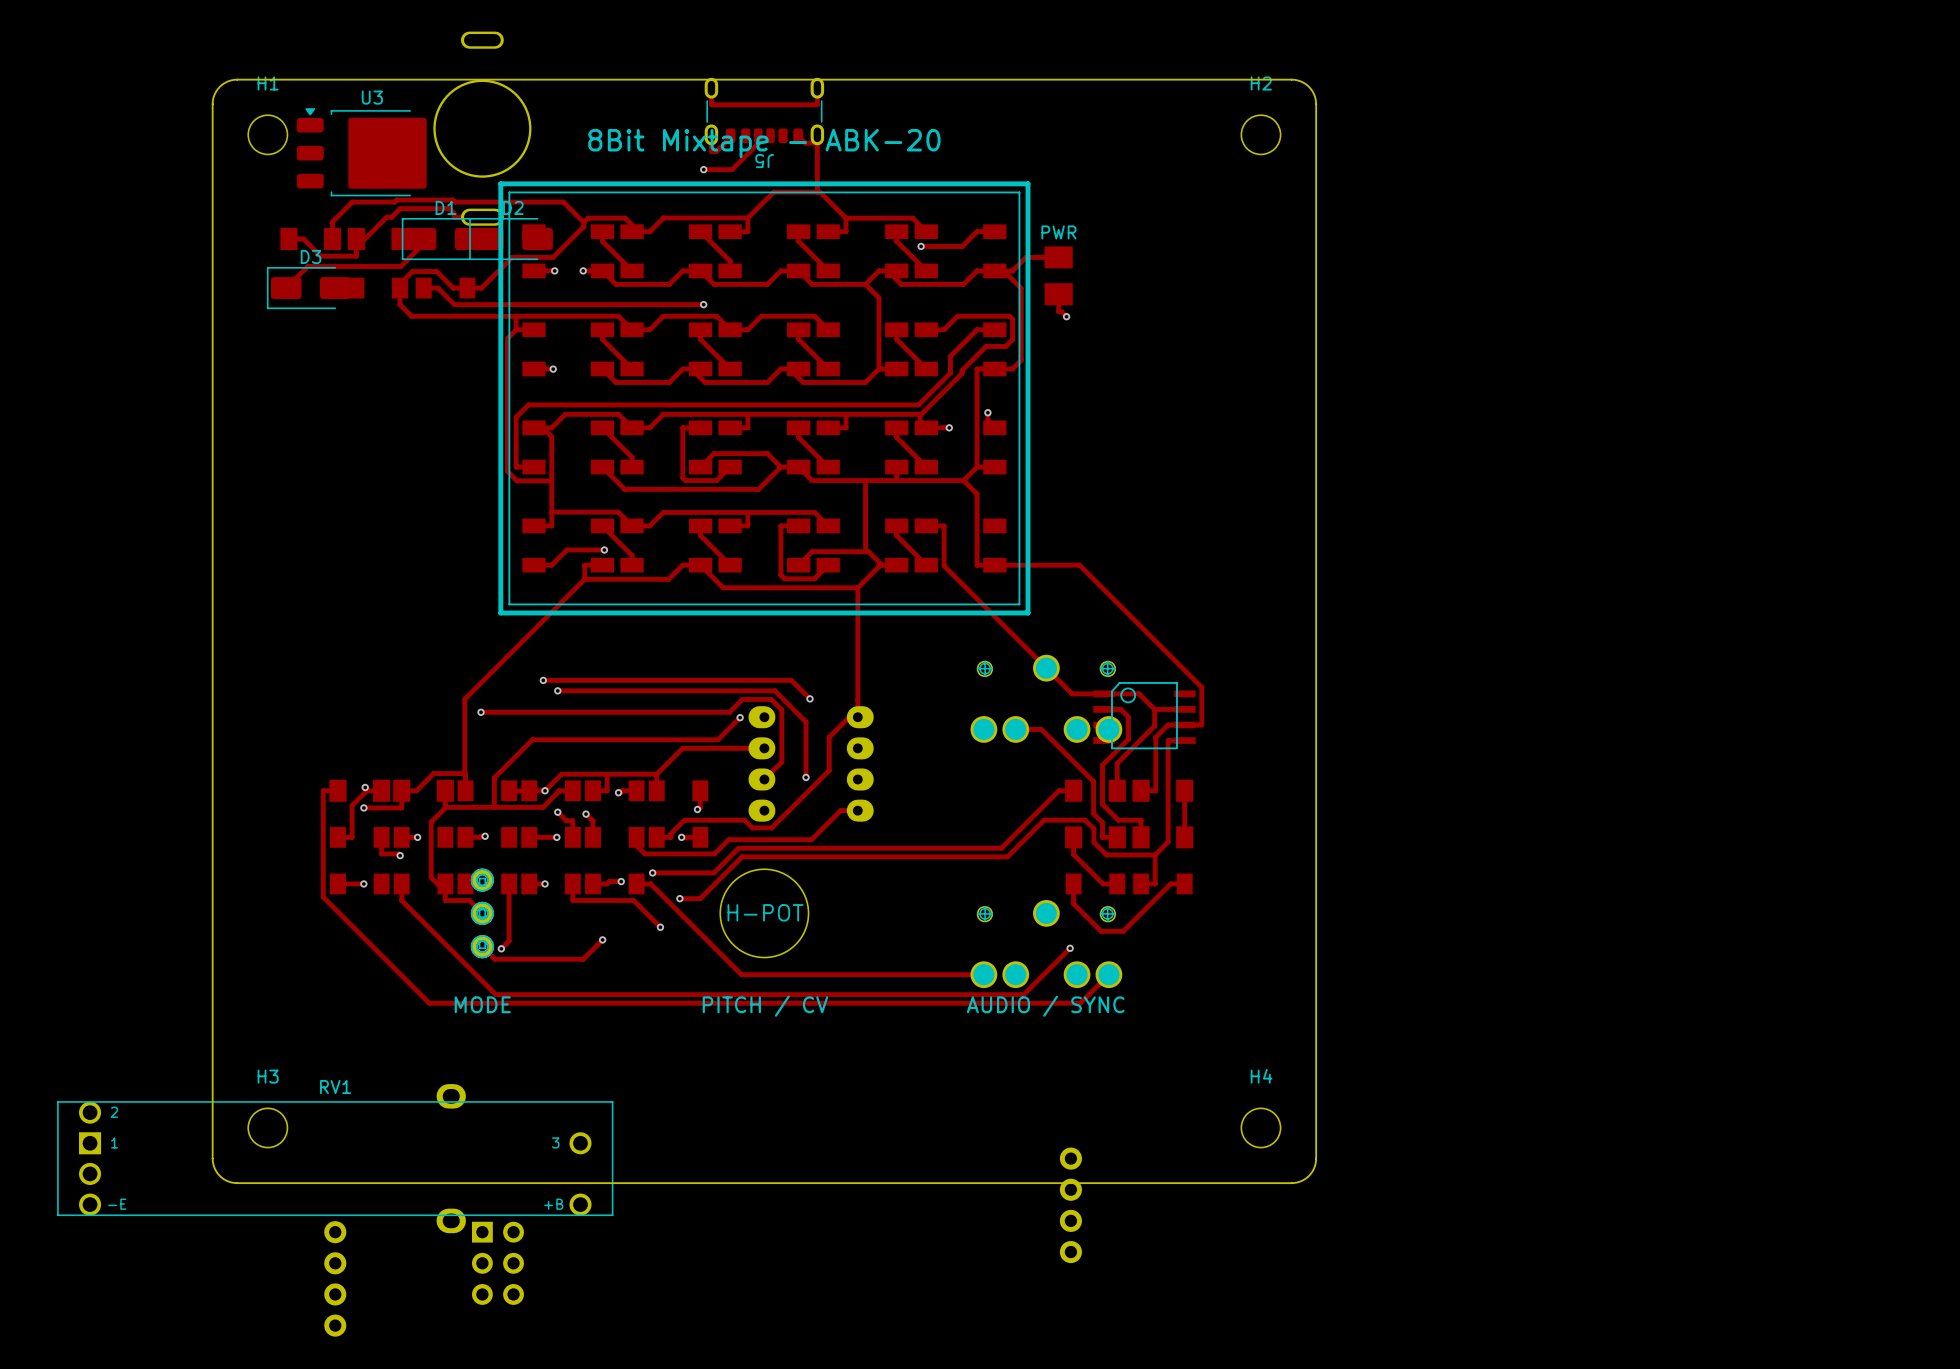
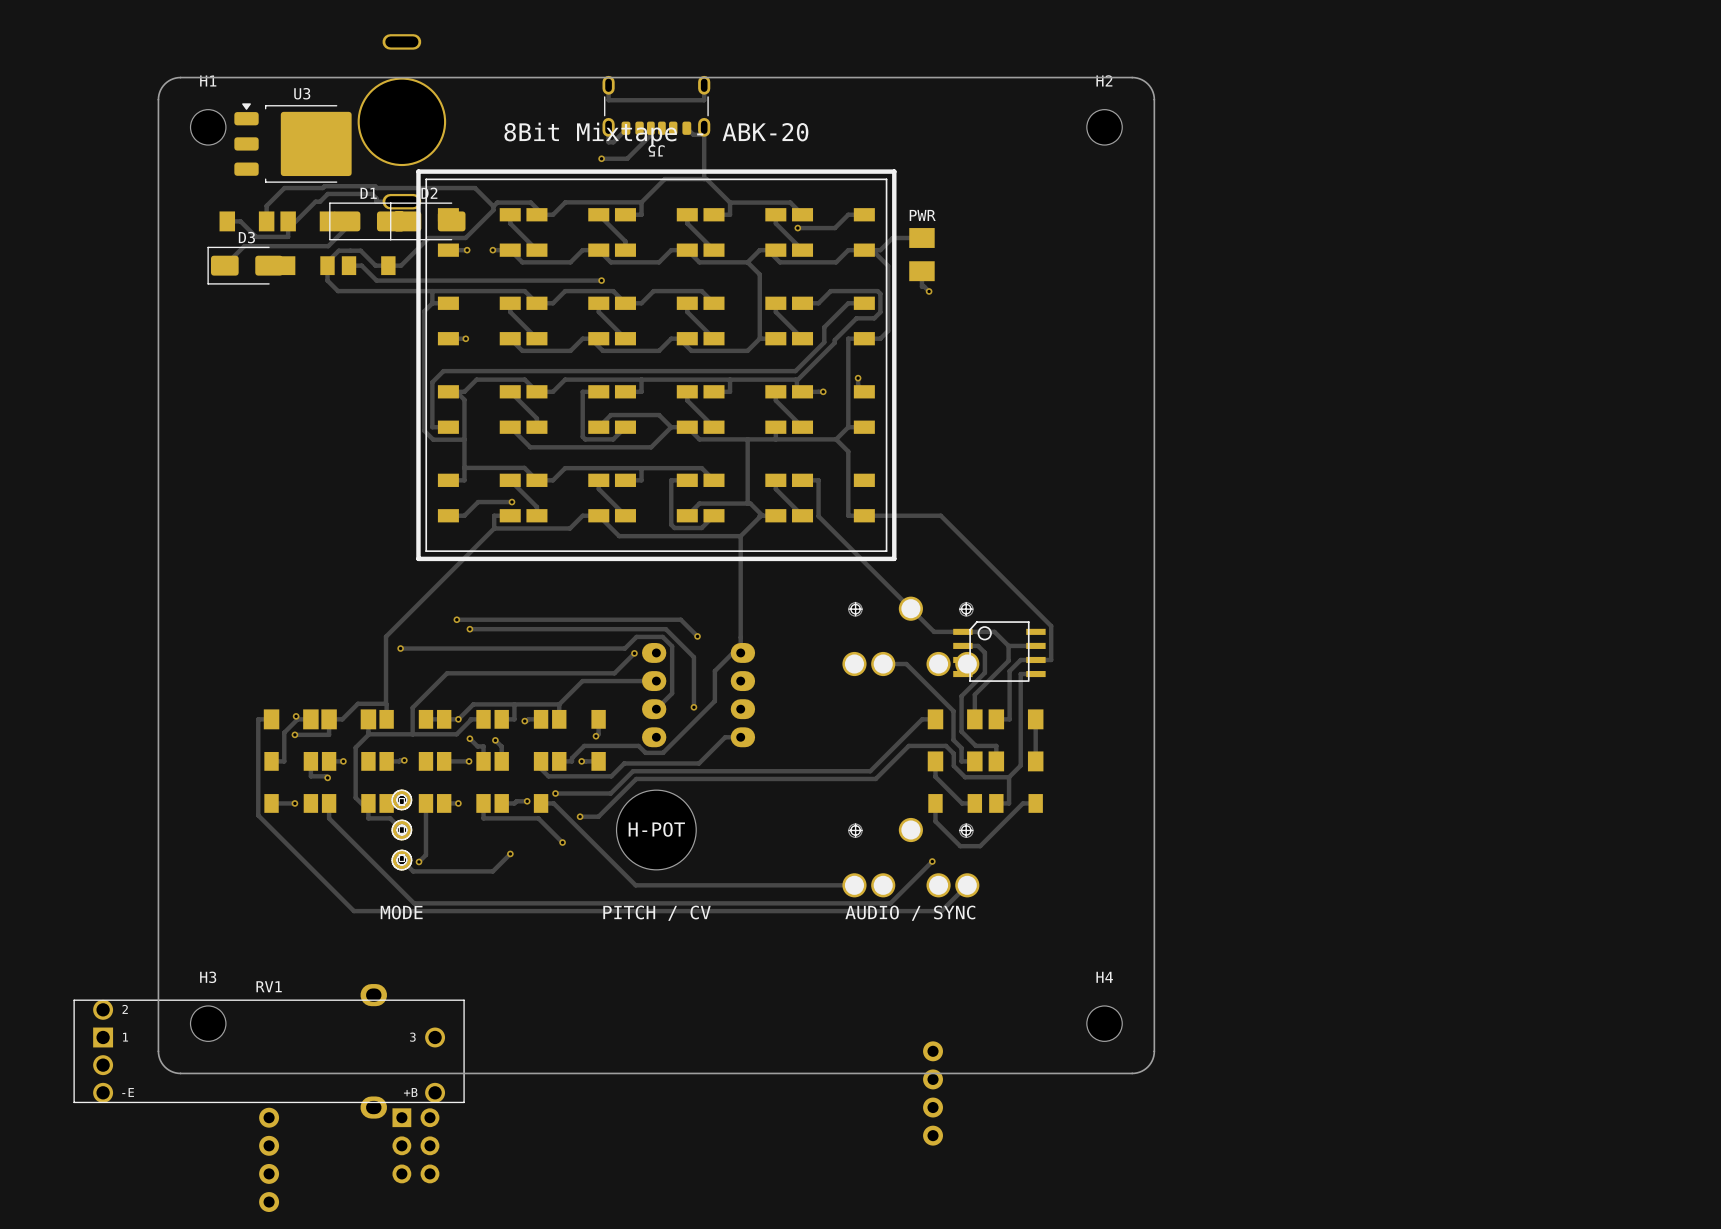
RV1 footprint: [57, 1101, 614, 1216] -> [73, 999, 465, 1104]

